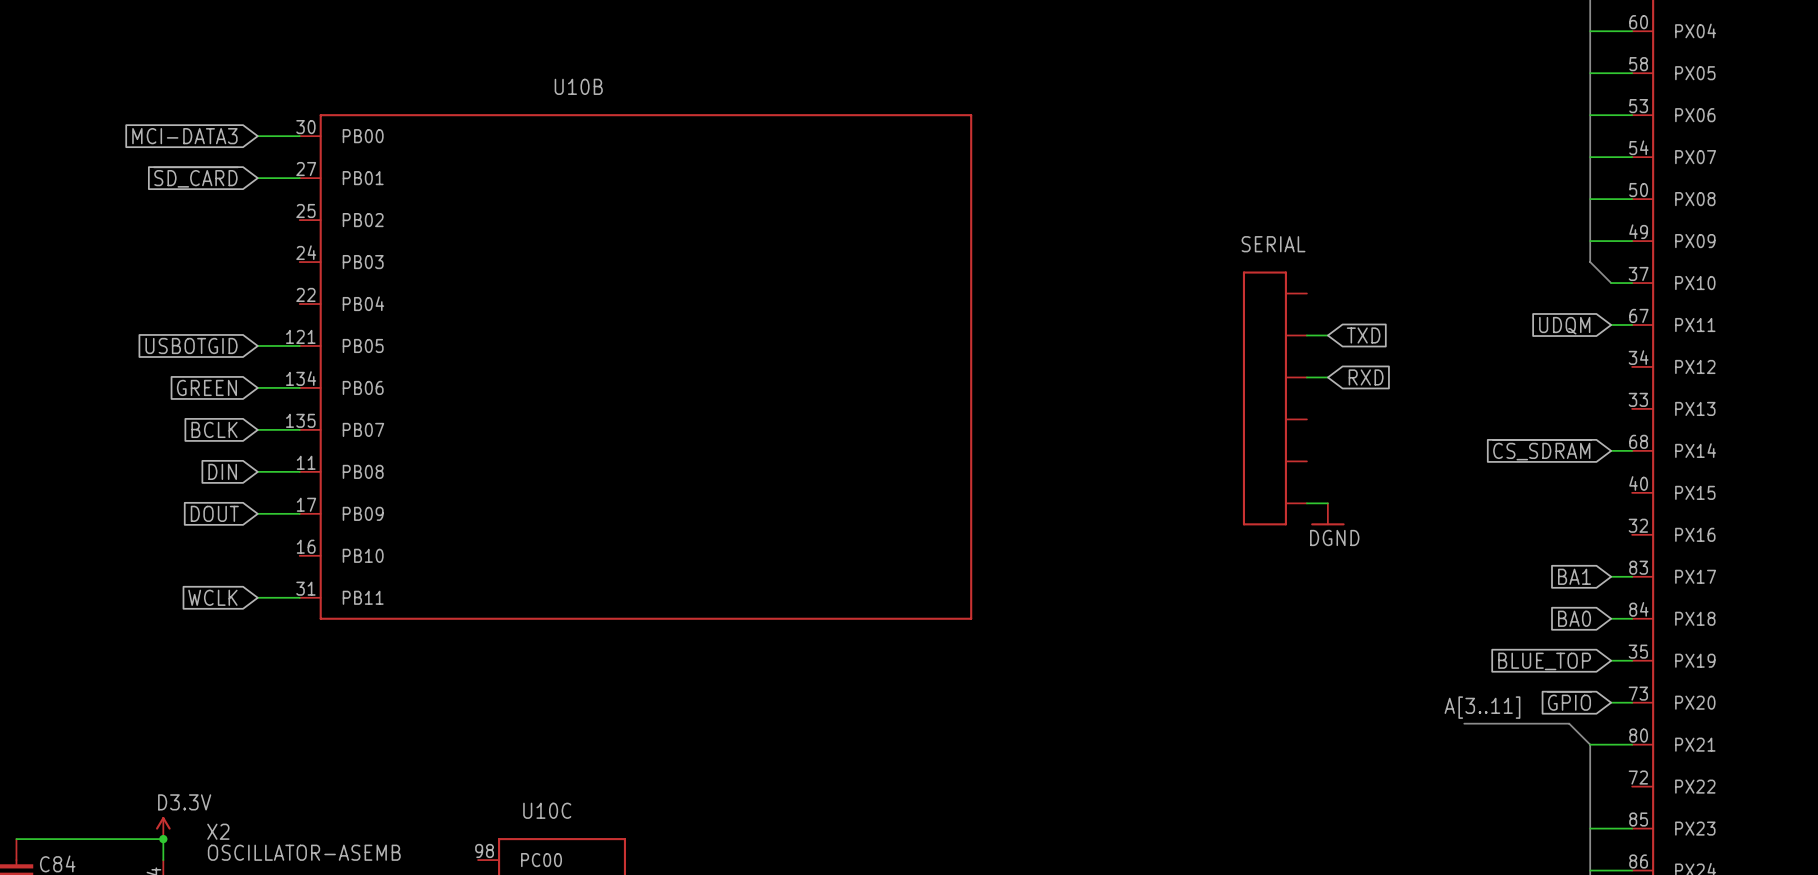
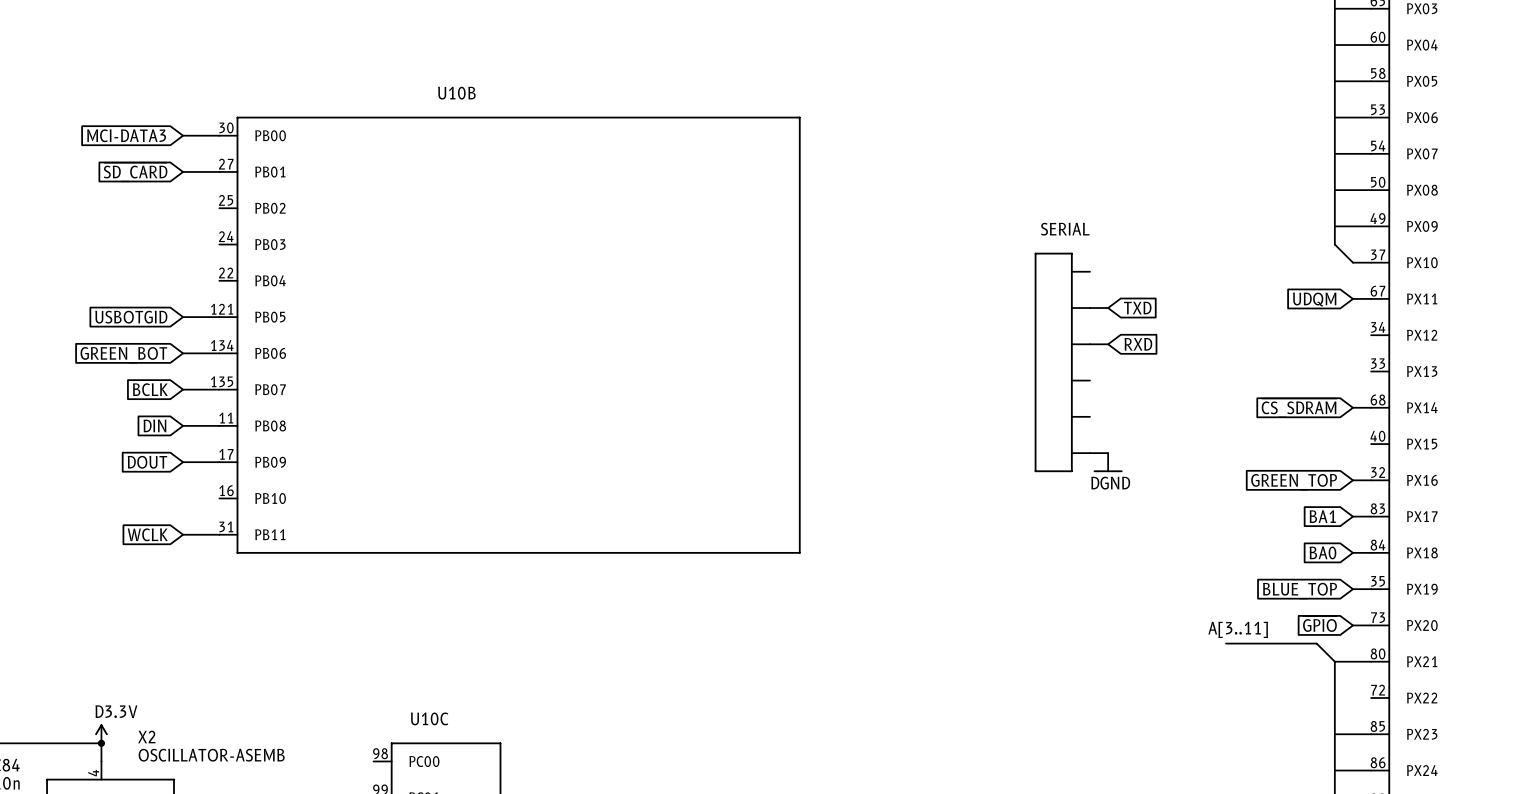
global label: GREEN (206, 387) -> GREEN_BOT (123, 355)
wire: none -> (1352, 480) (1371, 480)
global label: none -> GREEN_TOP (1294, 482)

